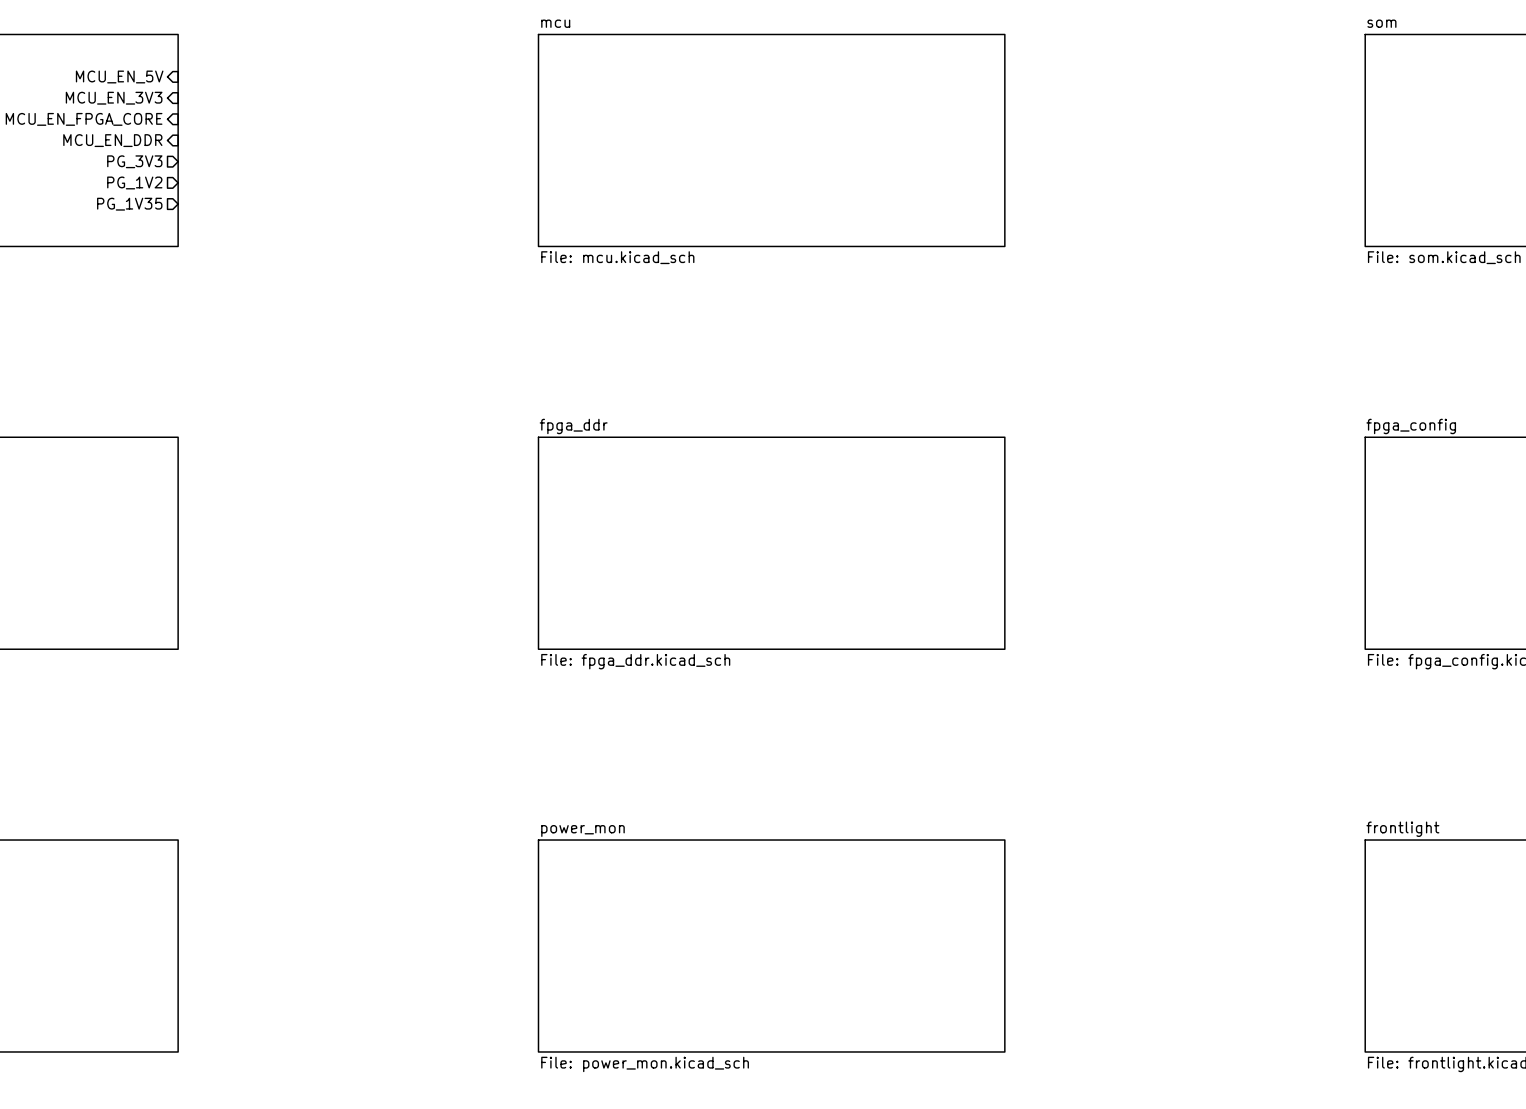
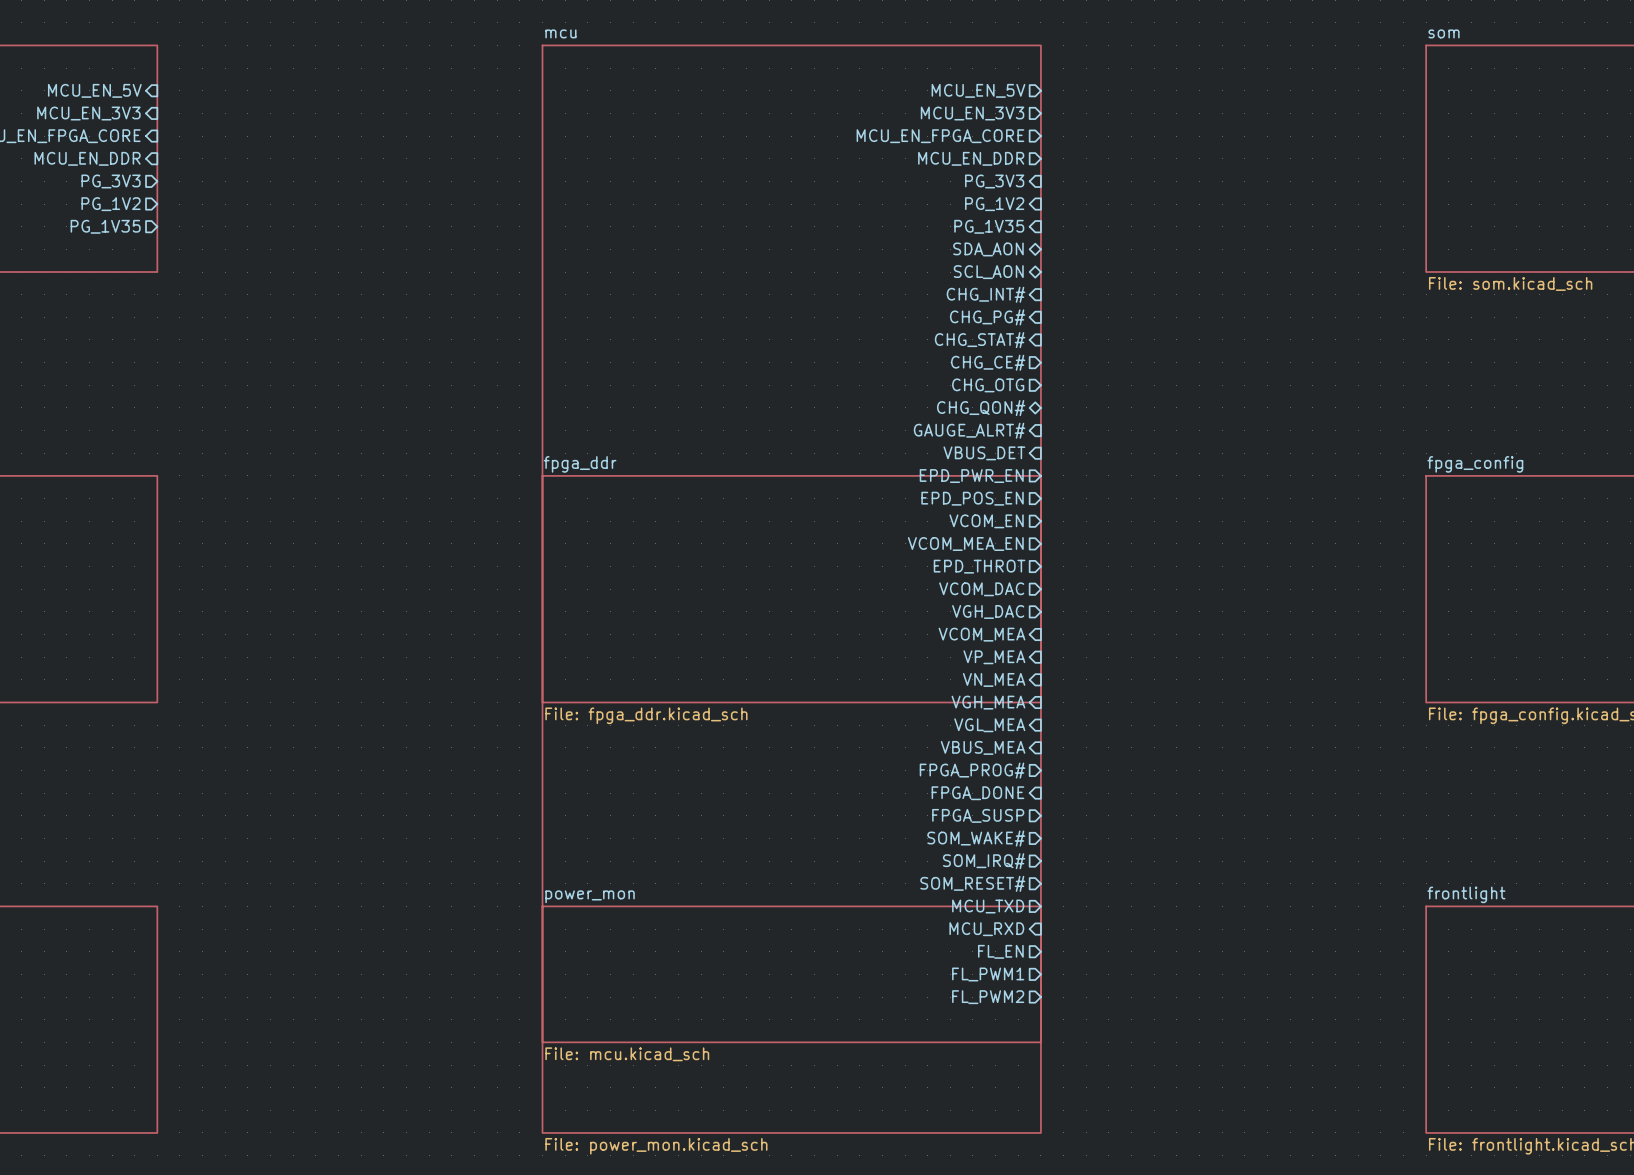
sheet pin: none -> MCU_EN_5V (978, 90)
sheet pin: none -> MCU_EN_3V3 (972, 113)
sheet pin: none -> MCU_EN_FPGA_CORE (940, 136)
sheet mcu: File: mcu.kicad_sch (771, 140) -> none
sheet pin: none -> MCU_EN_DDR (971, 158)
sheet pin: none -> PG_3V3 (994, 181)
sheet pin: none -> PG_1V2 (994, 204)
sheet pin: none -> PG_1V35 (989, 226)
sheet pin: none -> SDA_AON (988, 249)
sheet pin: none -> SCL_AON (988, 272)
sheet pin: none -> CHG_INT# (986, 294)
sheet pin: none -> CHG_PG# (987, 317)
sheet pin: none -> CHG_STAT# (980, 340)
sheet pin: none -> CHG_CE# (988, 362)
sheet pin: none -> CHG_OTG (988, 385)
sheet pin: none -> CHG_QON# (981, 408)
sheet pin: none -> GAUGE_ALRT# (969, 430)
sheet pin: none -> VBUS_DET (984, 453)
sheet pin: none -> EPD_PWR_EN (971, 476)
sheet pin: none -> EPD_POS_EN (972, 498)
sheet pin: none -> VCOM_EN (986, 521)
sheet mcu: none -> File: mcu.kicad_sch (791, 543)
sheet pin: none -> VCOM_MEA_EN (965, 544)
sheet pin: none -> EPD_THROT (979, 566)
sheet pin: none -> VCOM_DAC (981, 589)
sheet pin: none -> VGH_DAC (988, 611)
sheet pin: none -> VCOM_MEA (981, 634)
sheet pin: none -> VP_MEA (994, 657)
sheet pin: none -> VN_MEA (994, 679)
sheet pin: none -> VGH_MEA (988, 702)
sheet pin: none -> VGL_MEA (989, 725)
sheet pin: none -> VBUS_MEA (983, 747)
sheet pin: none -> FPGA_PROG# (972, 770)
sheet pin: none -> FPGA_DONE (977, 793)
sheet pin: none -> FPGA_SUSP (978, 815)
sheet pin: none -> SOM_WAKE# (976, 838)
sheet pin: none -> SOM_IRQ# (984, 861)
sheet pin: none -> SOM_RESET# (972, 883)
sheet pin: none -> MCU_TXD (988, 906)
sheet pin: none -> MCU_RXD (986, 929)
sheet pin: none -> FL_EN (1000, 951)
sheet pin: none -> FL_PWM1 (988, 974)
sheet pin: none -> FL_PWM2 (988, 997)

